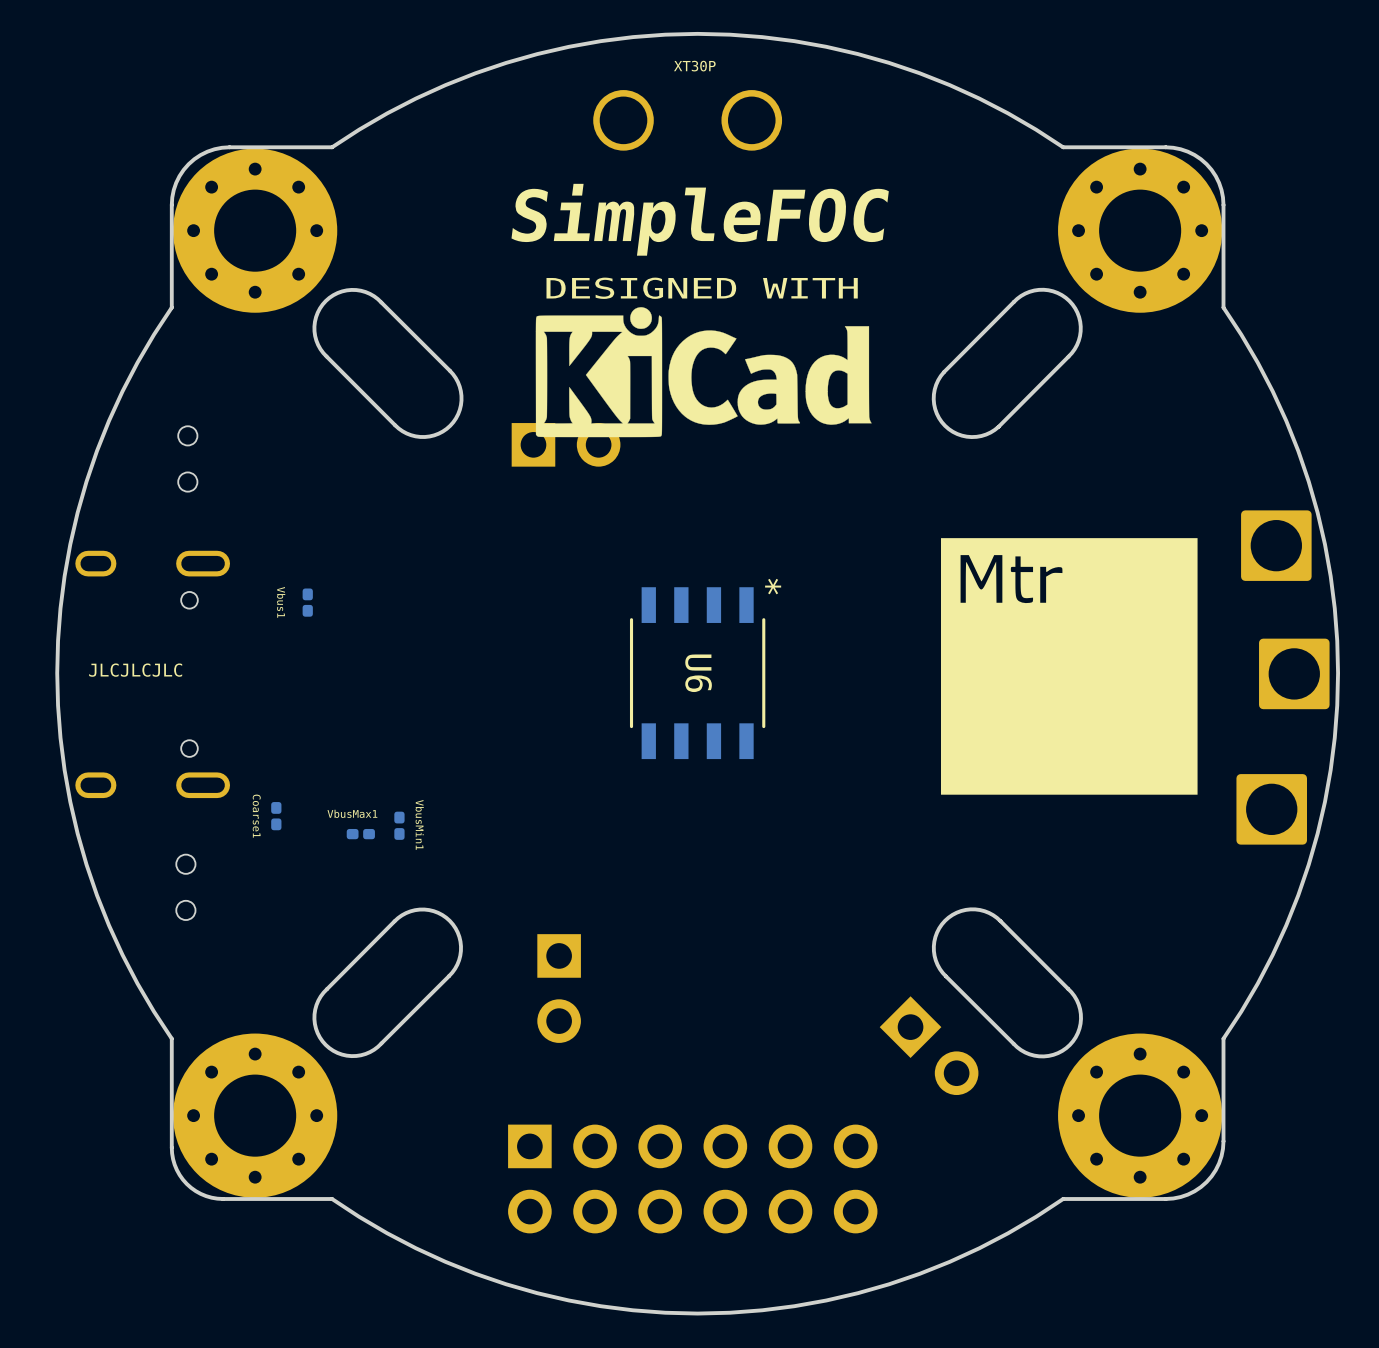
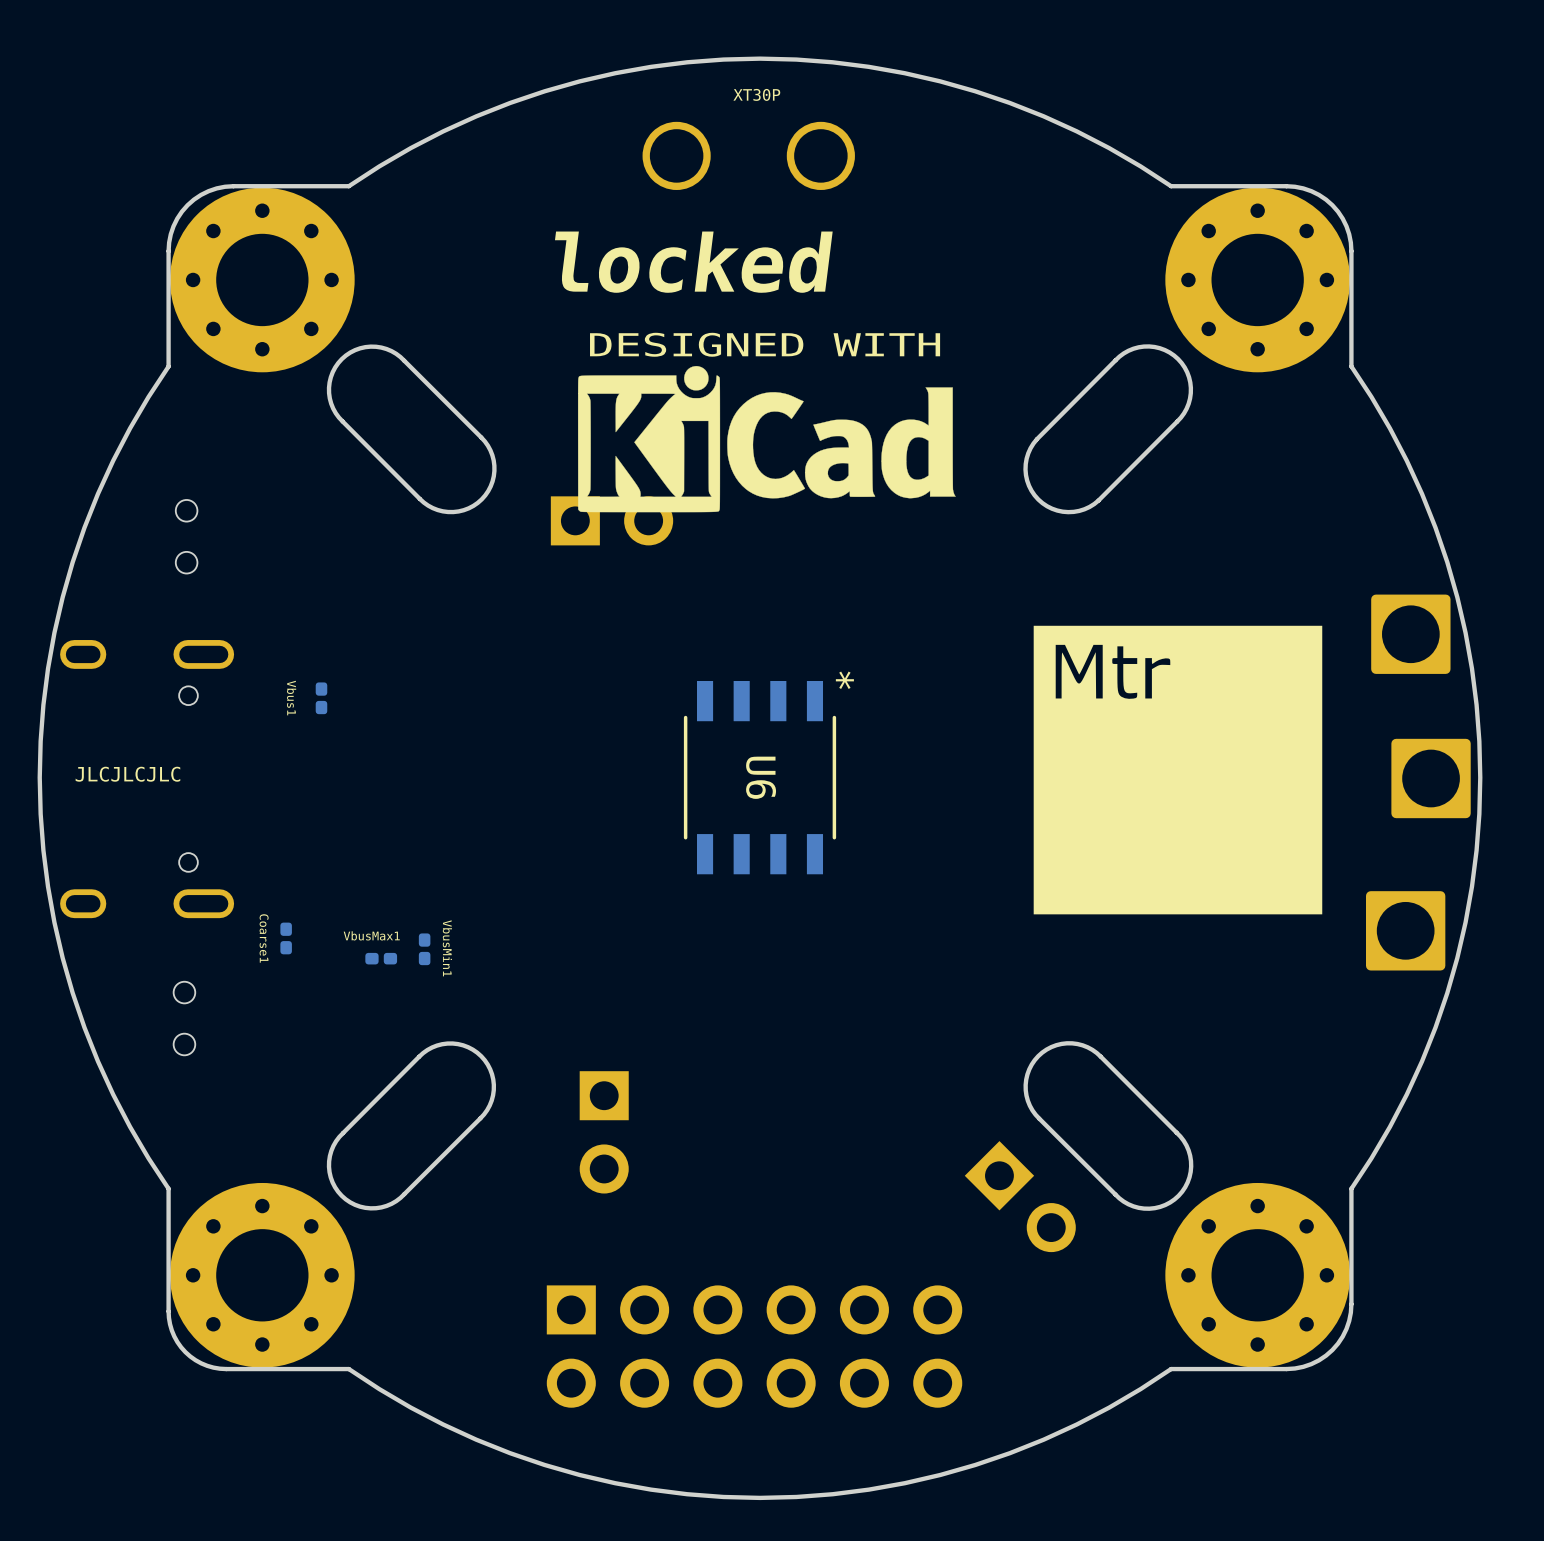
text: SimpleFOC (700, 219) -> locked (693, 262)

